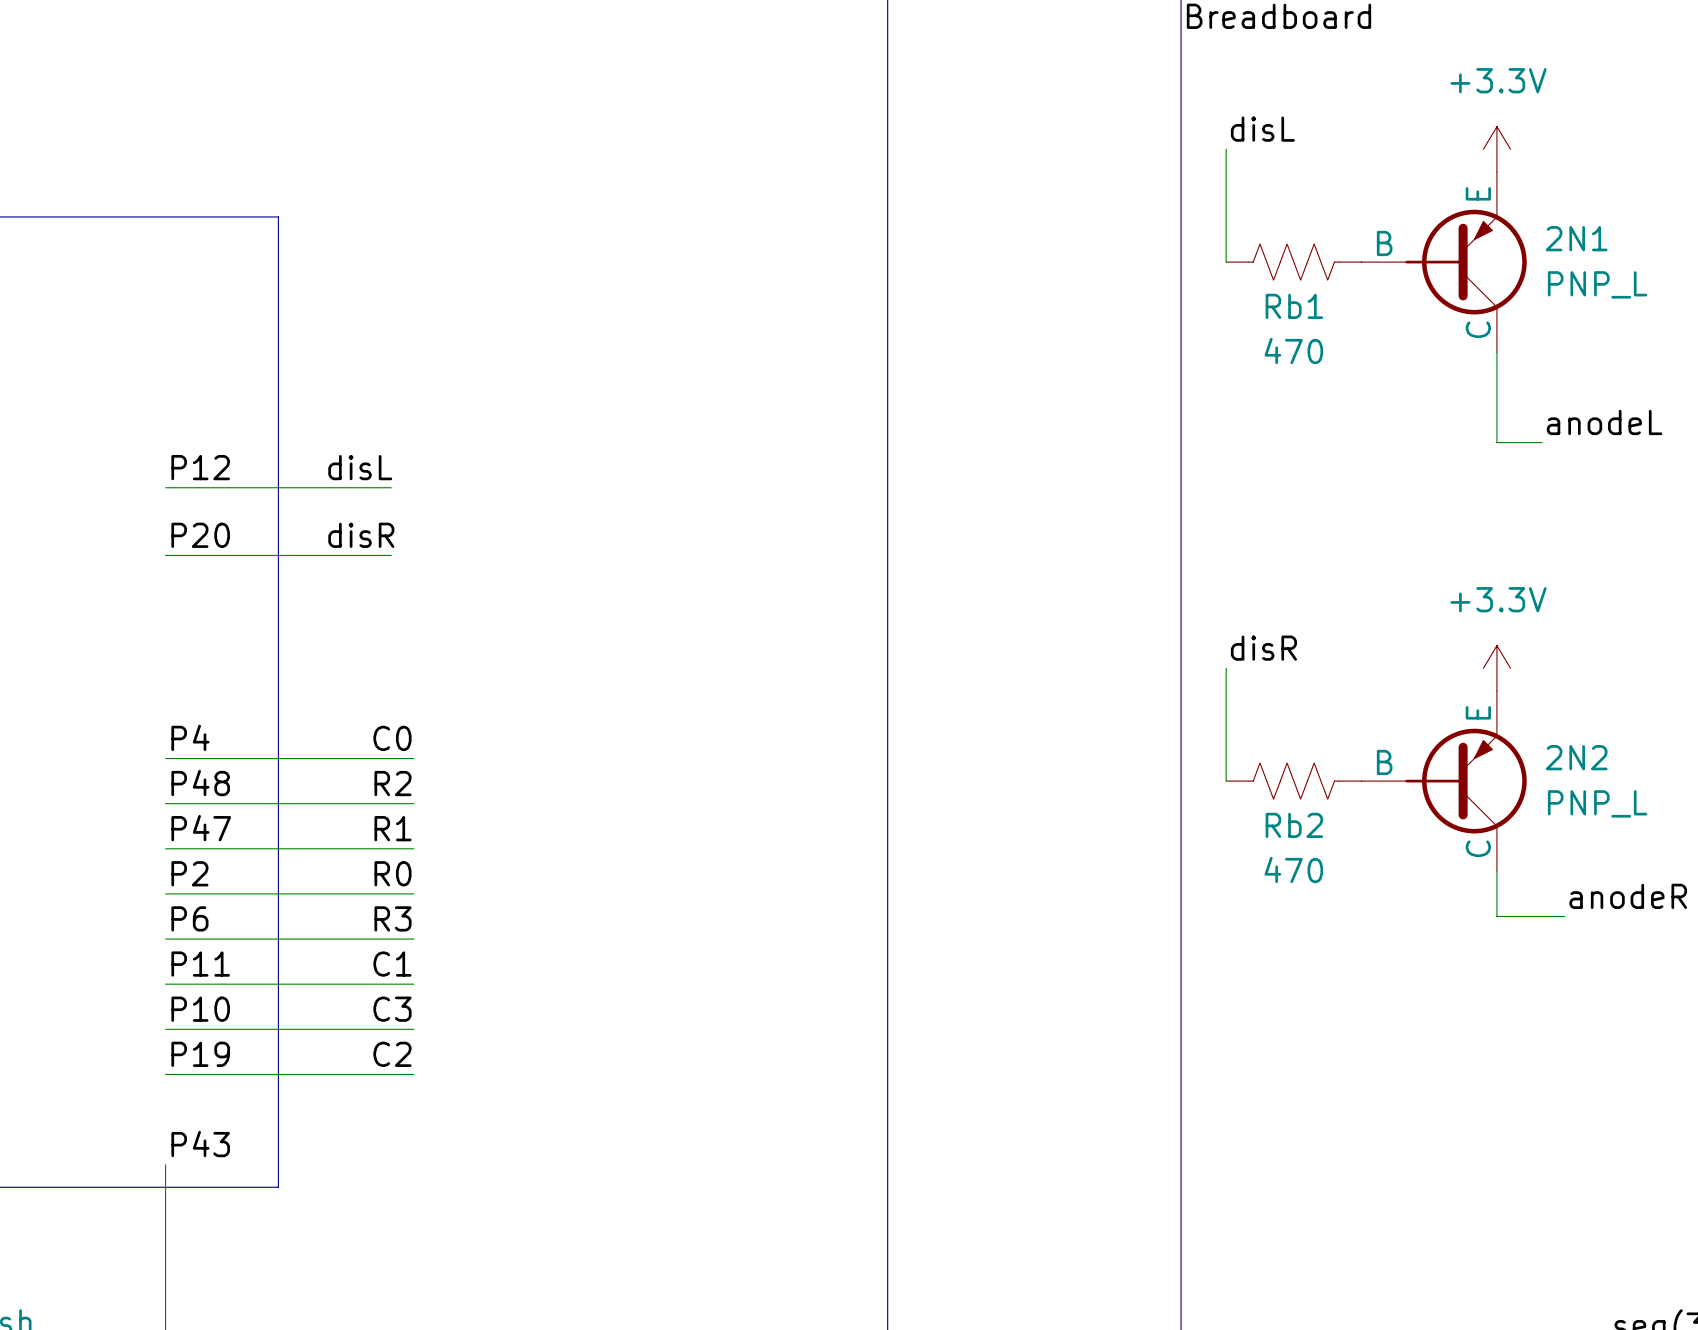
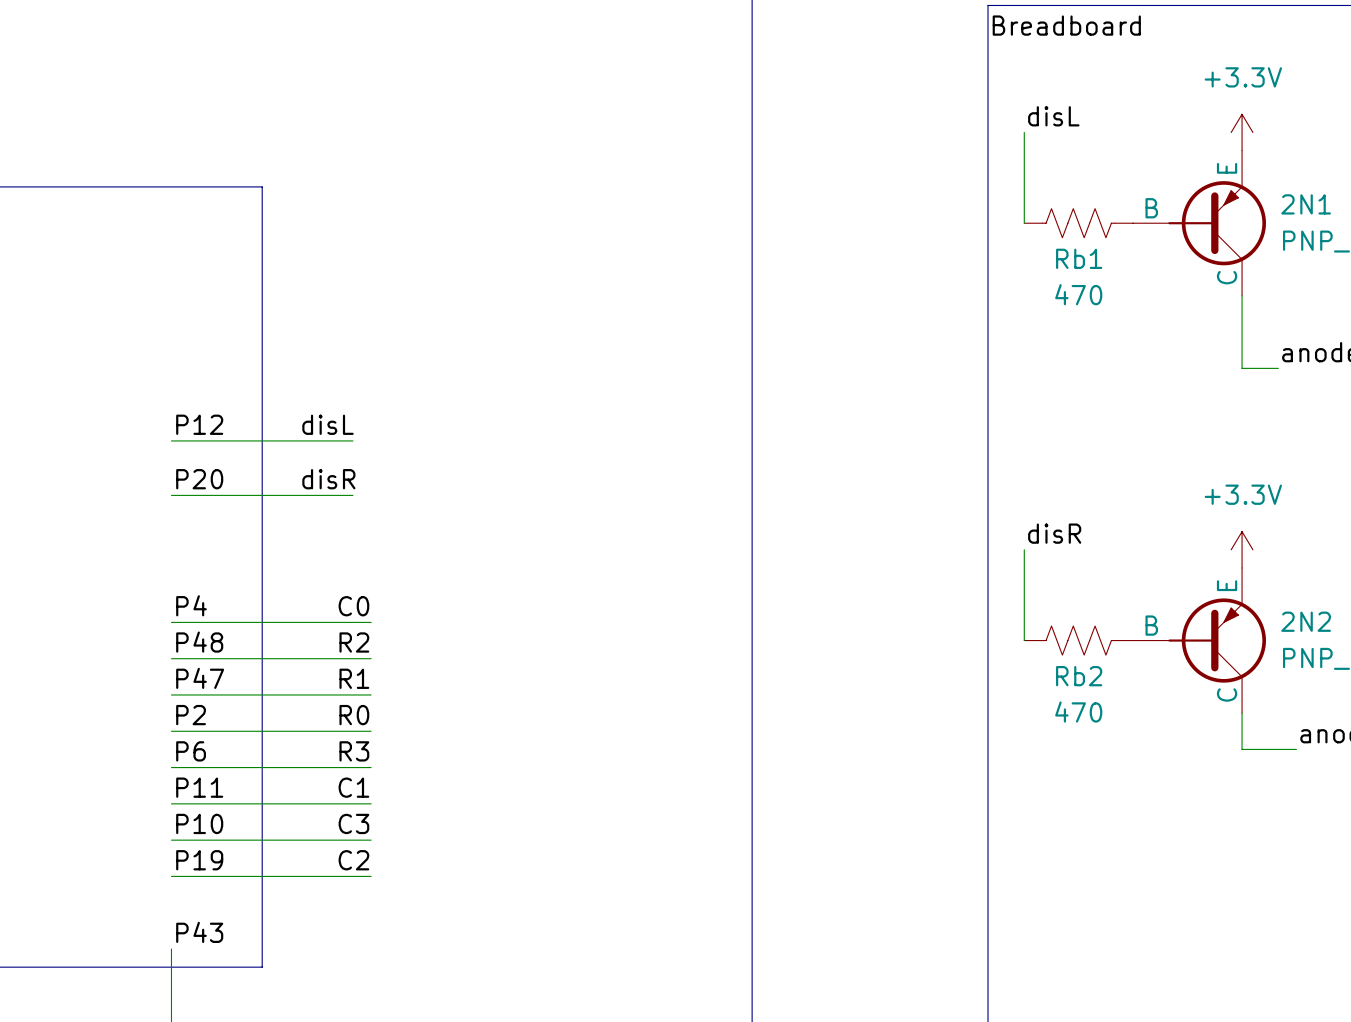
label position: P12 (200, 467) -> P12 (199, 424)
label position: disL (360, 467) -> disL (328, 424)
wire: (165, 487) (391, 487) -> (171, 440) (352, 440)
label position: P20 (200, 535) -> P20 (199, 479)
label position: disR (361, 535) -> disR (328, 479)
wire: (165, 555) (391, 555) -> (171, 495) (352, 495)

